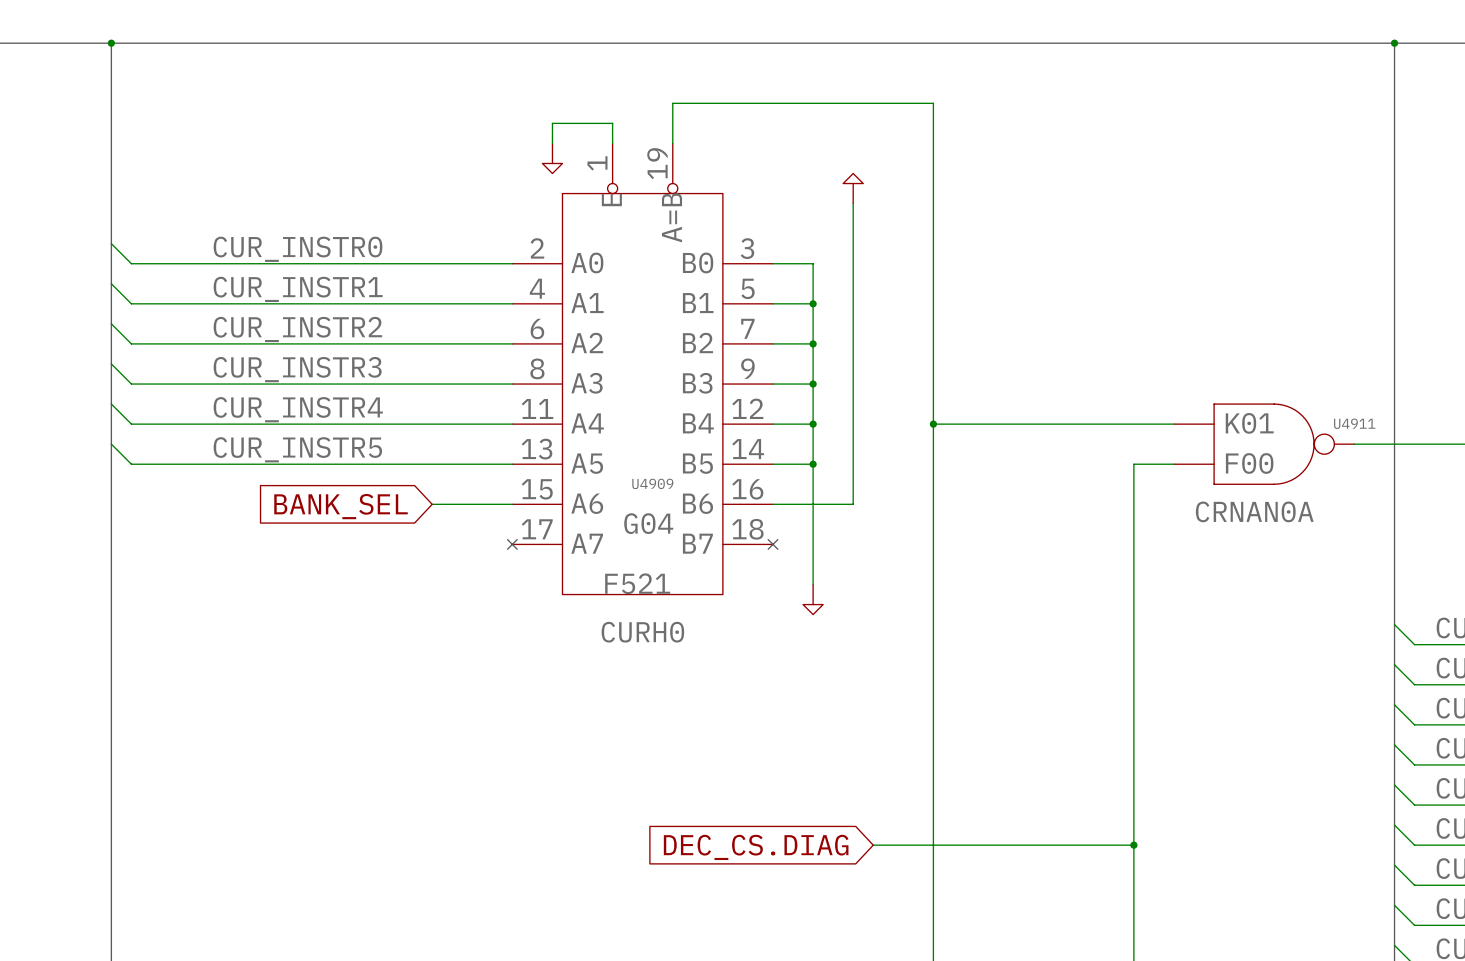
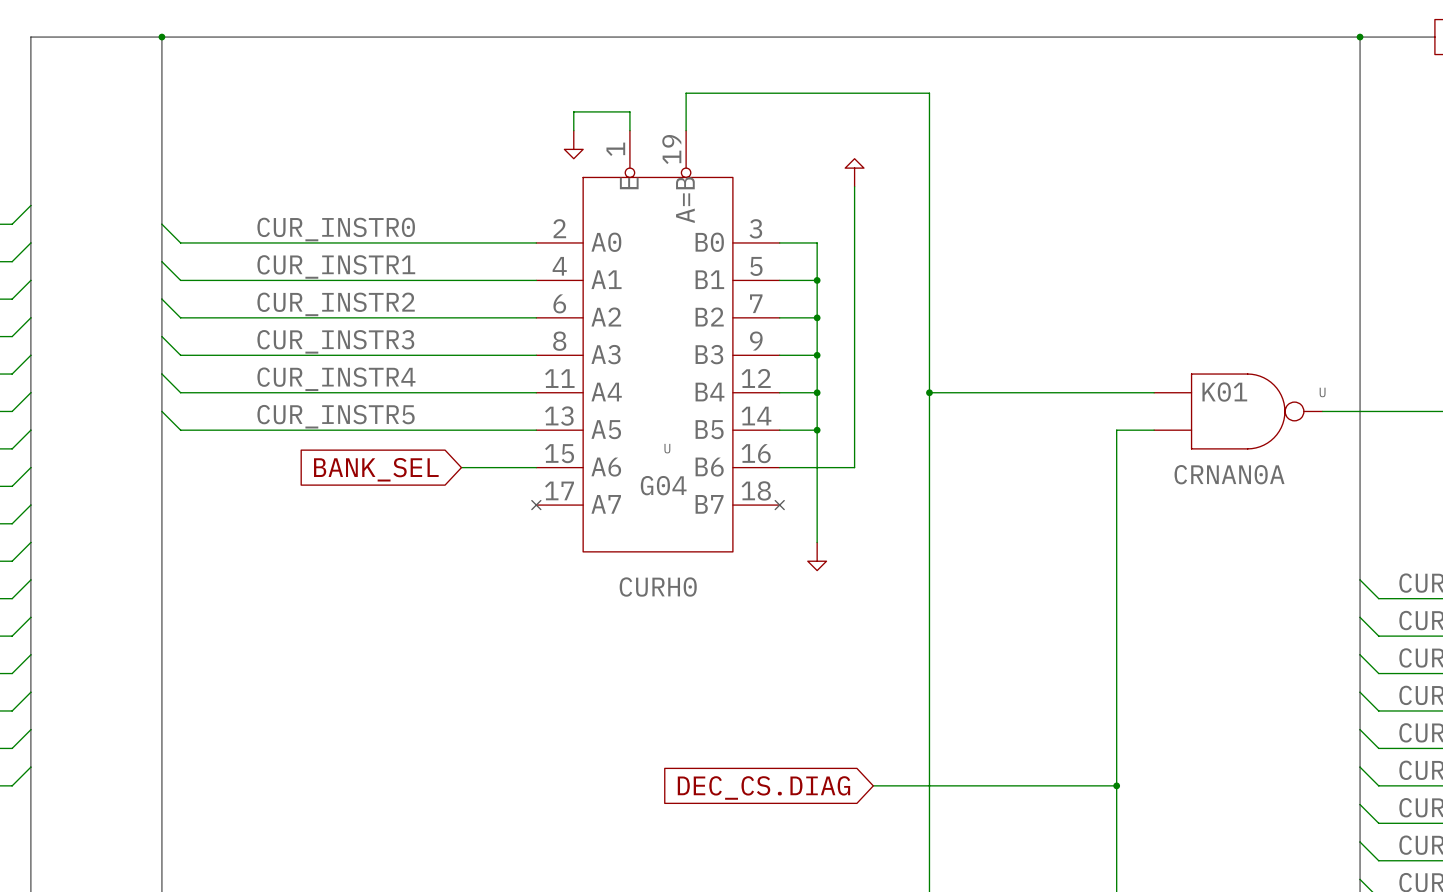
U4911 name: U4911 (1354, 423) -> U (1322, 392)
U4911 value: F00 (1249, 463) -> none
U4909 name: U4909 (652, 483) -> U (667, 448)
U4909 value: F521 (637, 583) -> none

